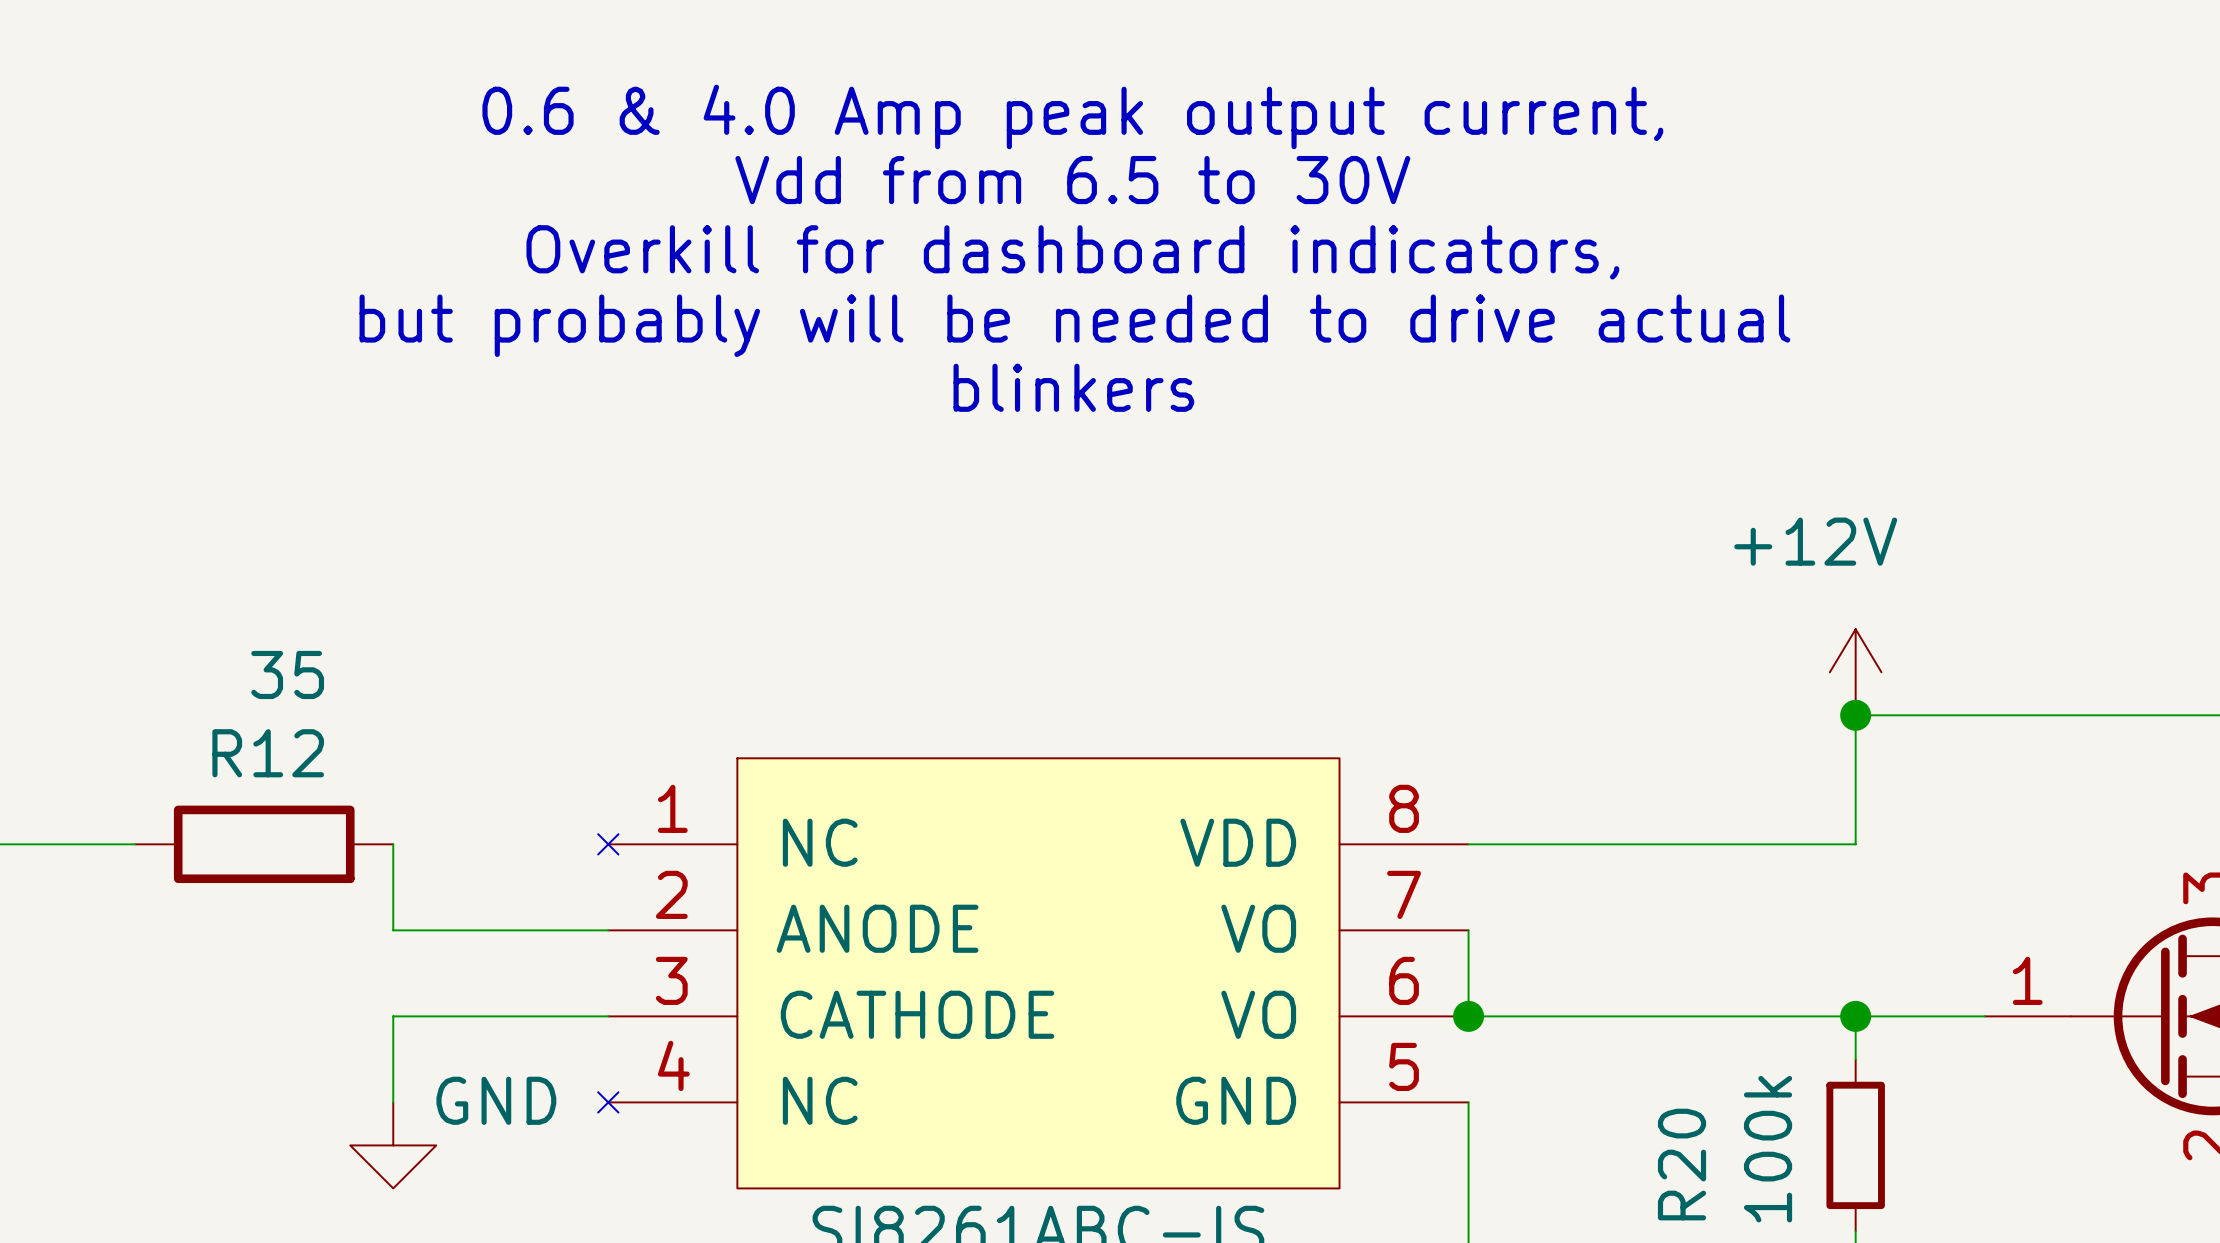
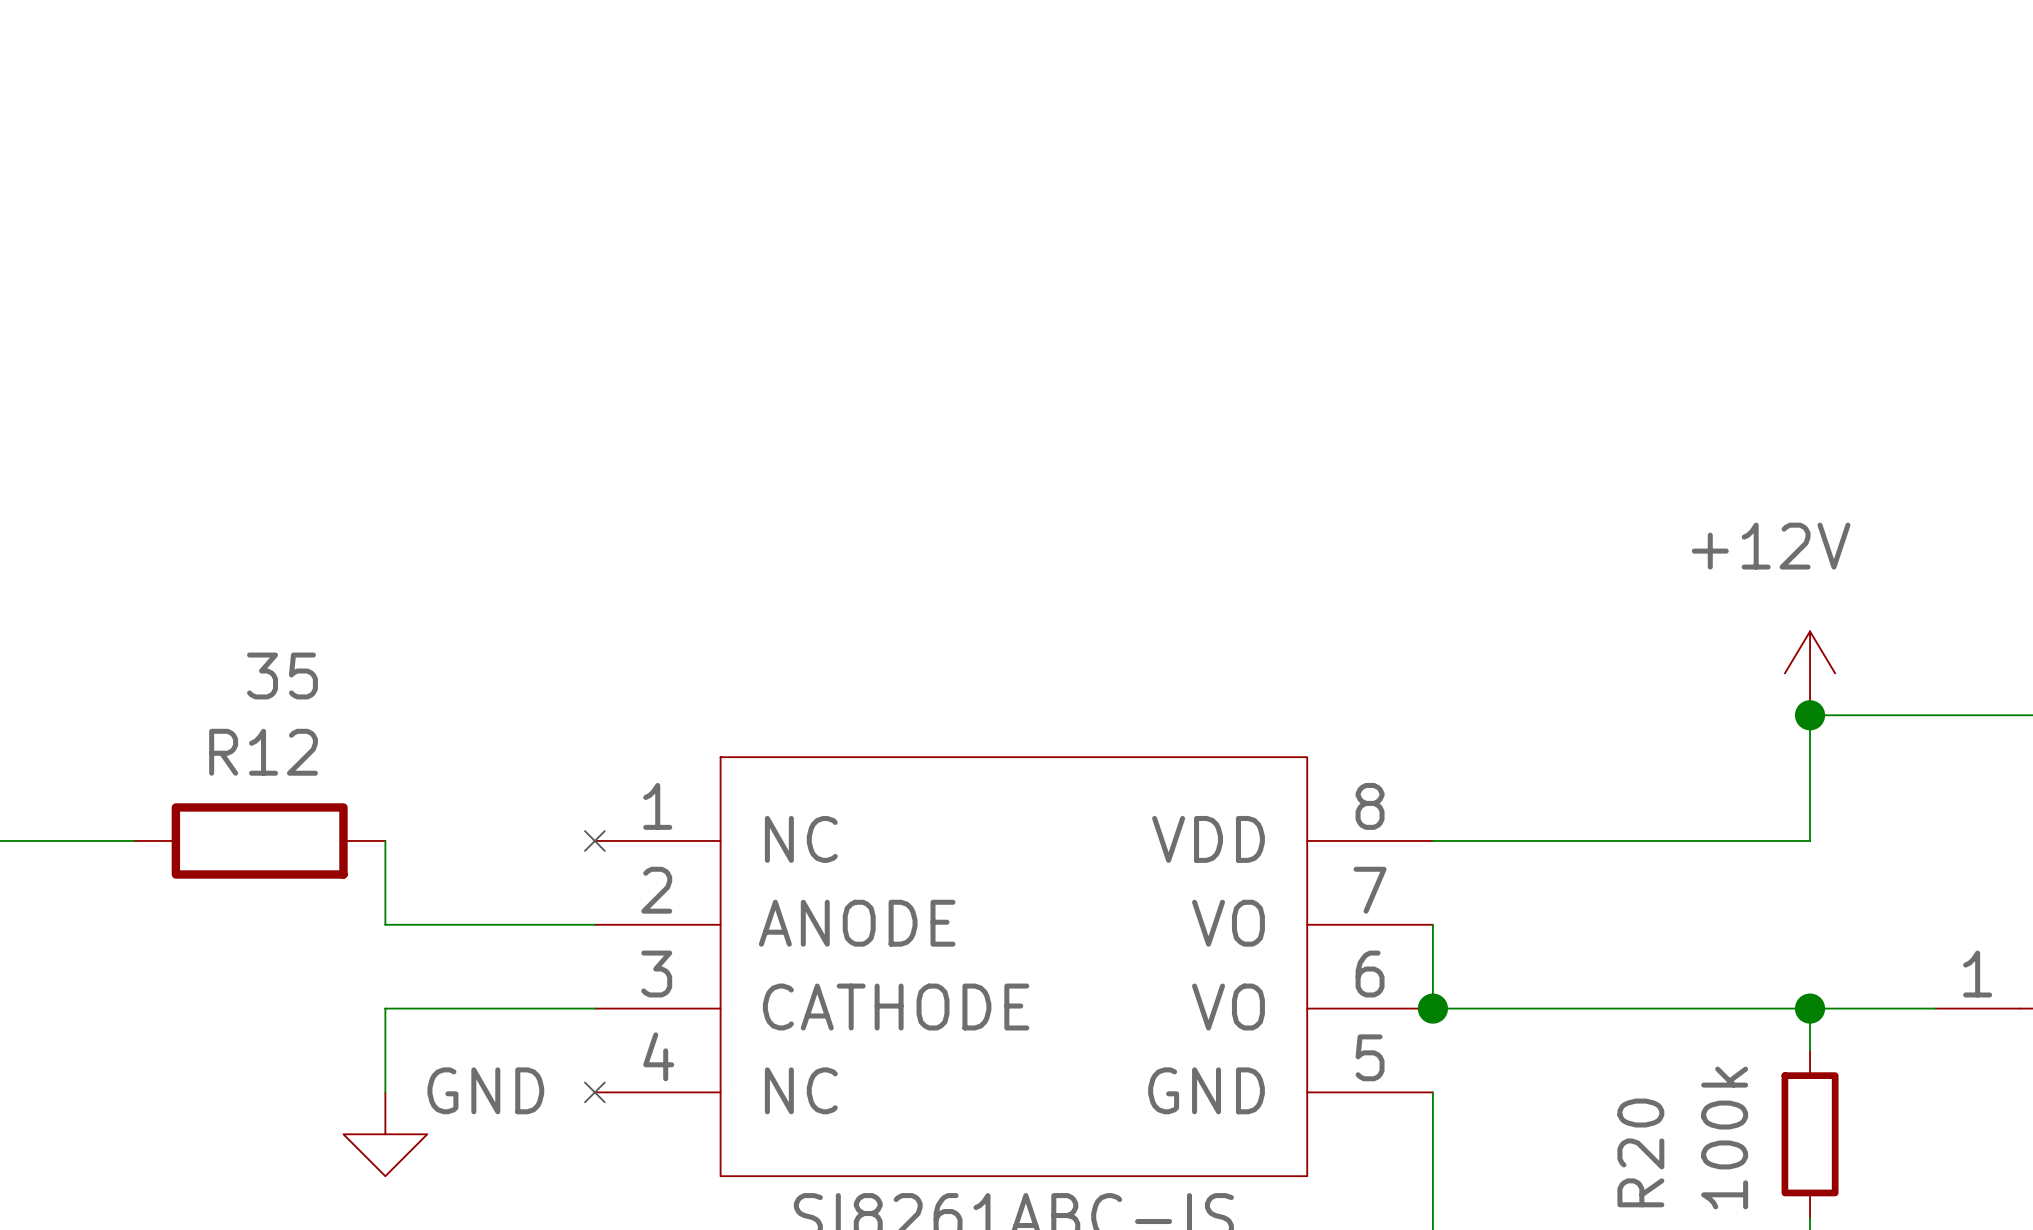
text: 0.6 & 4.0 Amp peak output current, (1072, 116) -> none
text: Vdd from 6.5 to 30V (1072, 180) -> none
text: Overkill for dashboard indicators, (1072, 252) -> none
text: but probably will be needed to drive actual (1074, 325) -> none
text: blinkers (1073, 387) -> none

